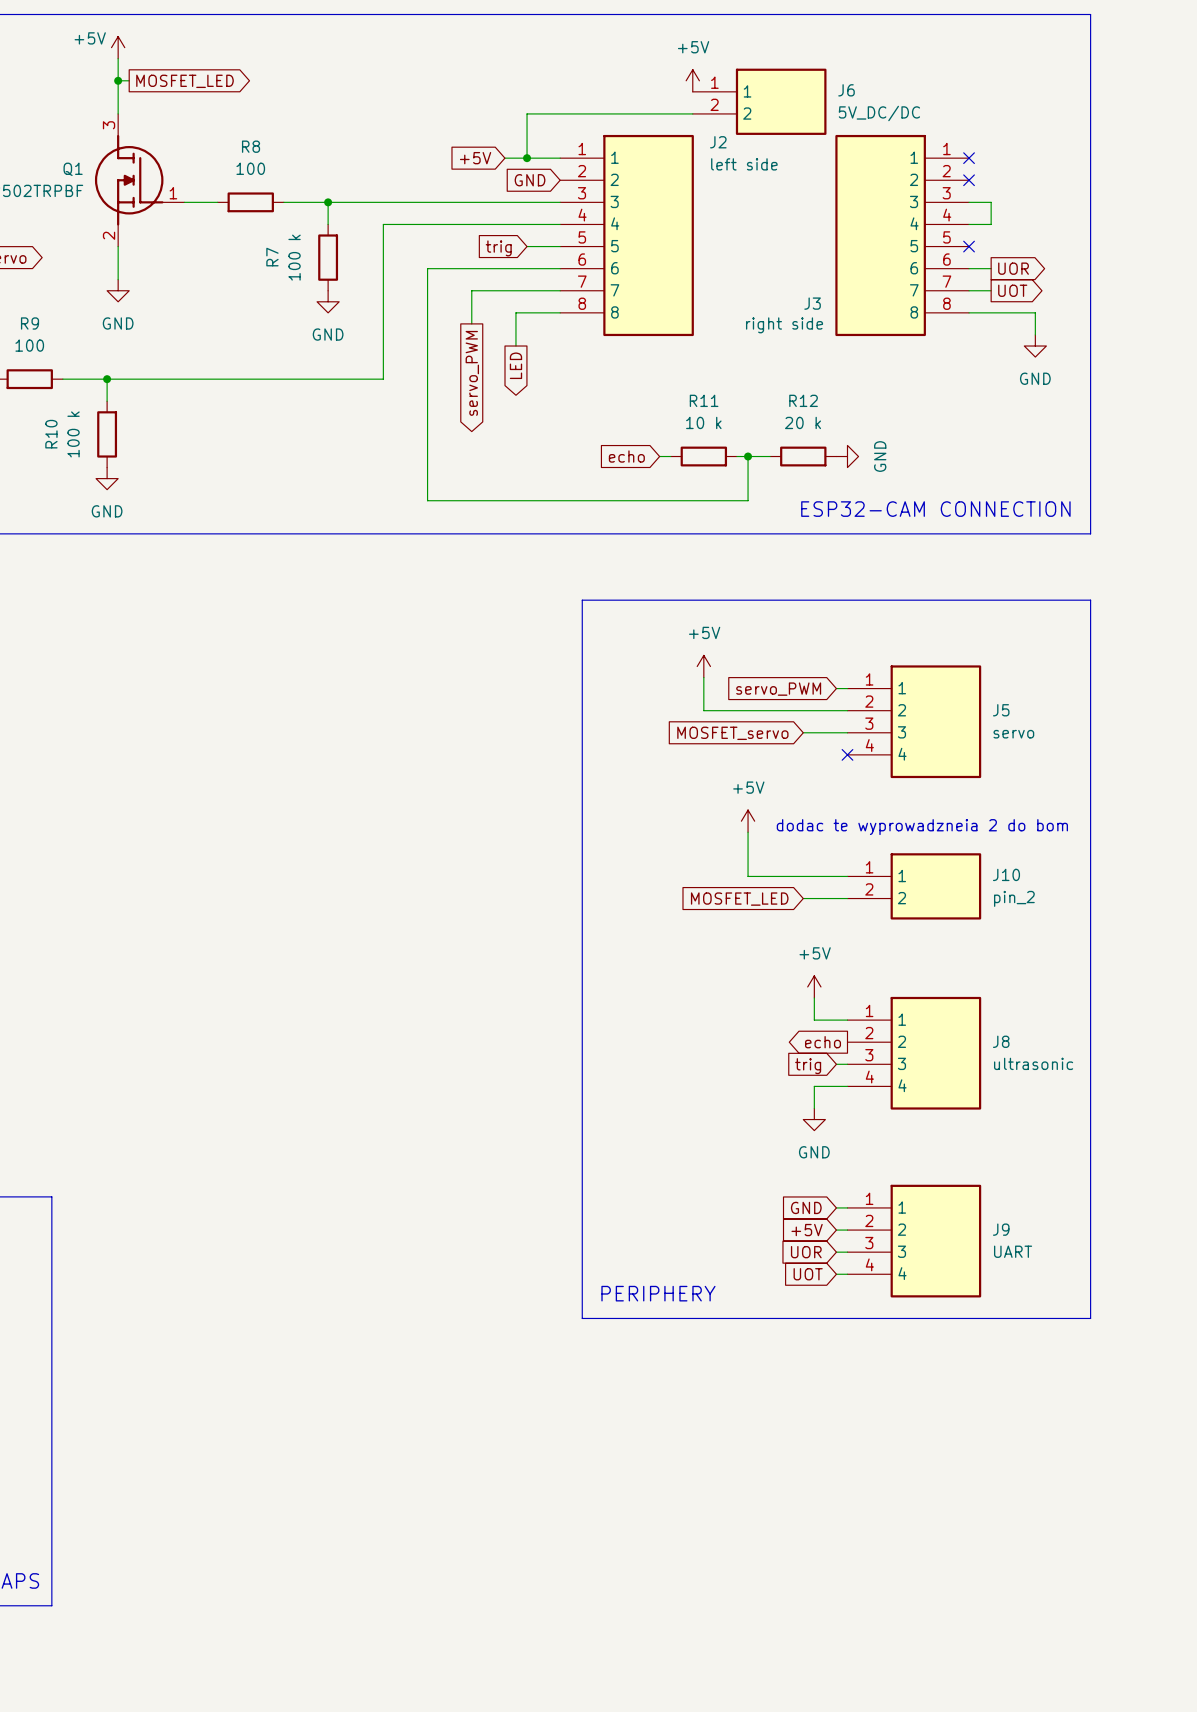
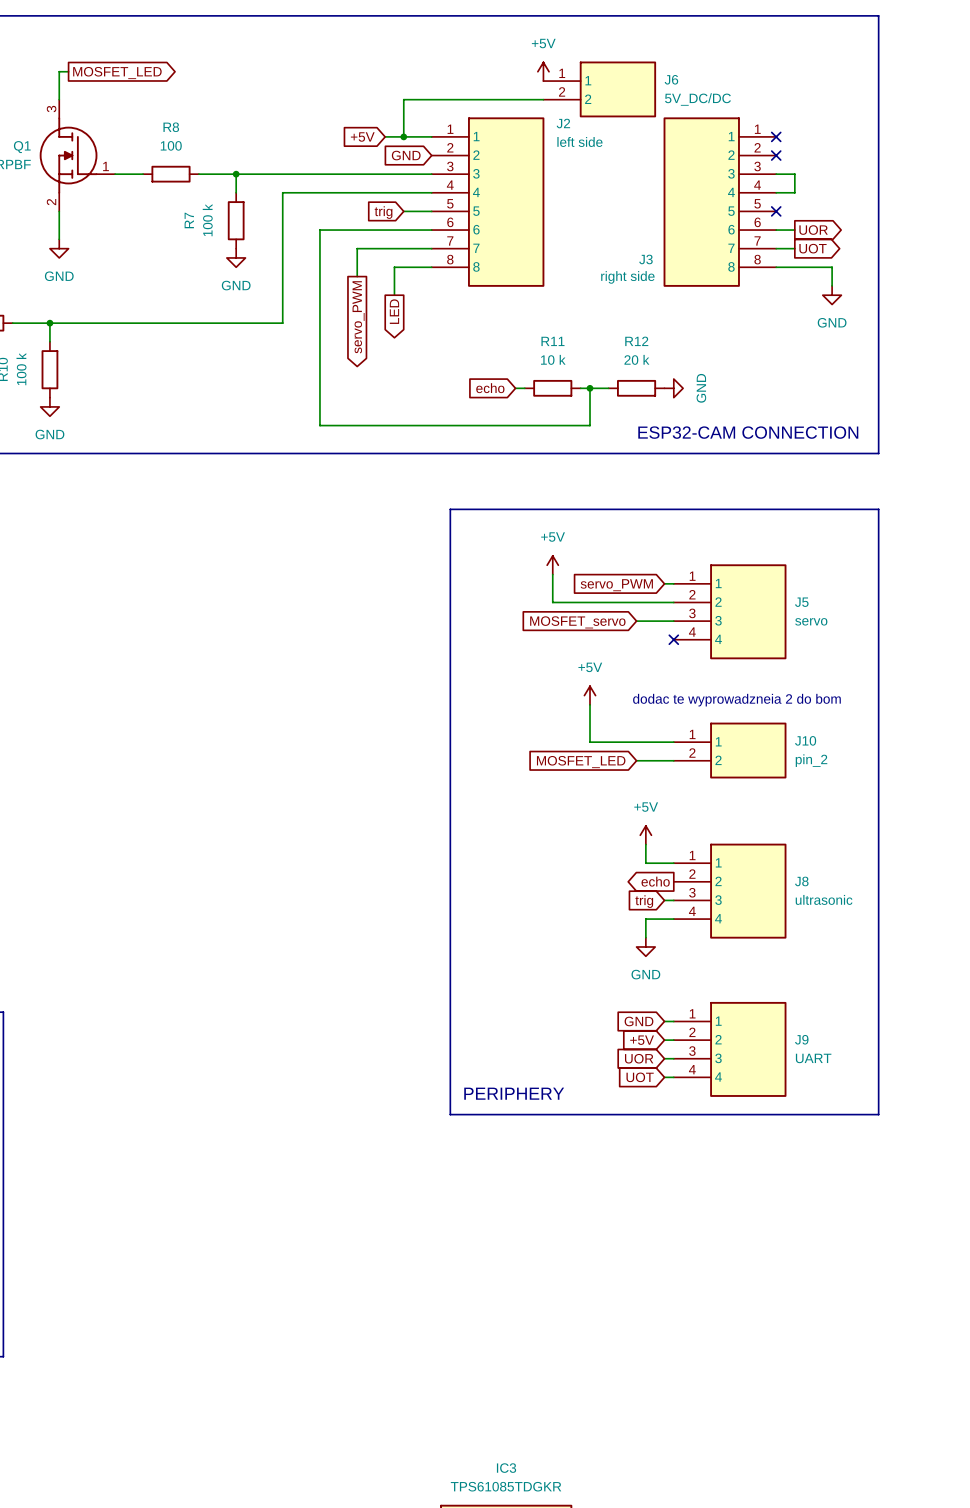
power symbol: +5V (118, 47) -> none
wire: (118, 58) (118, 80) -> none
junction: (118, 80) -> none

